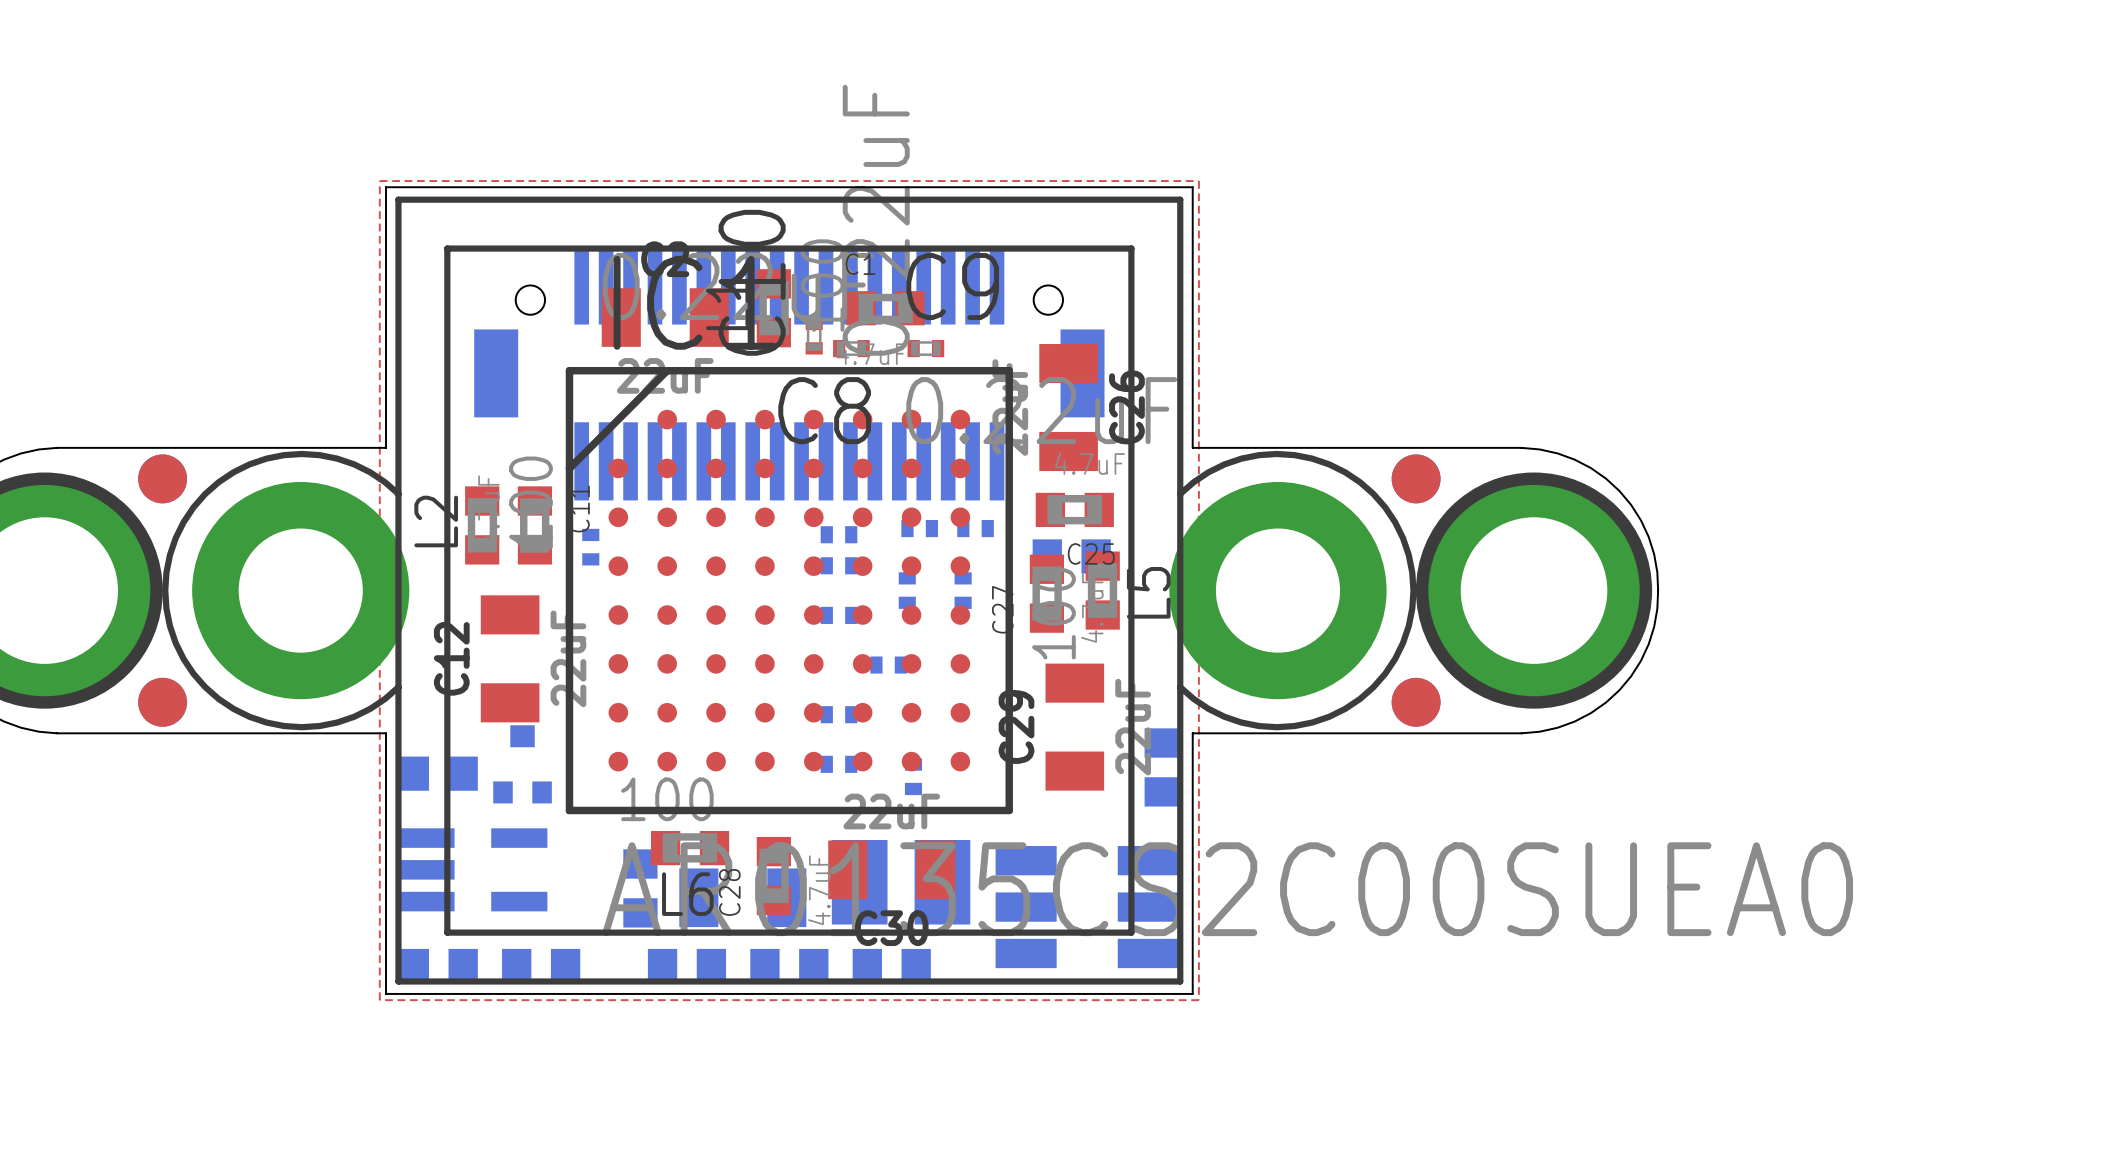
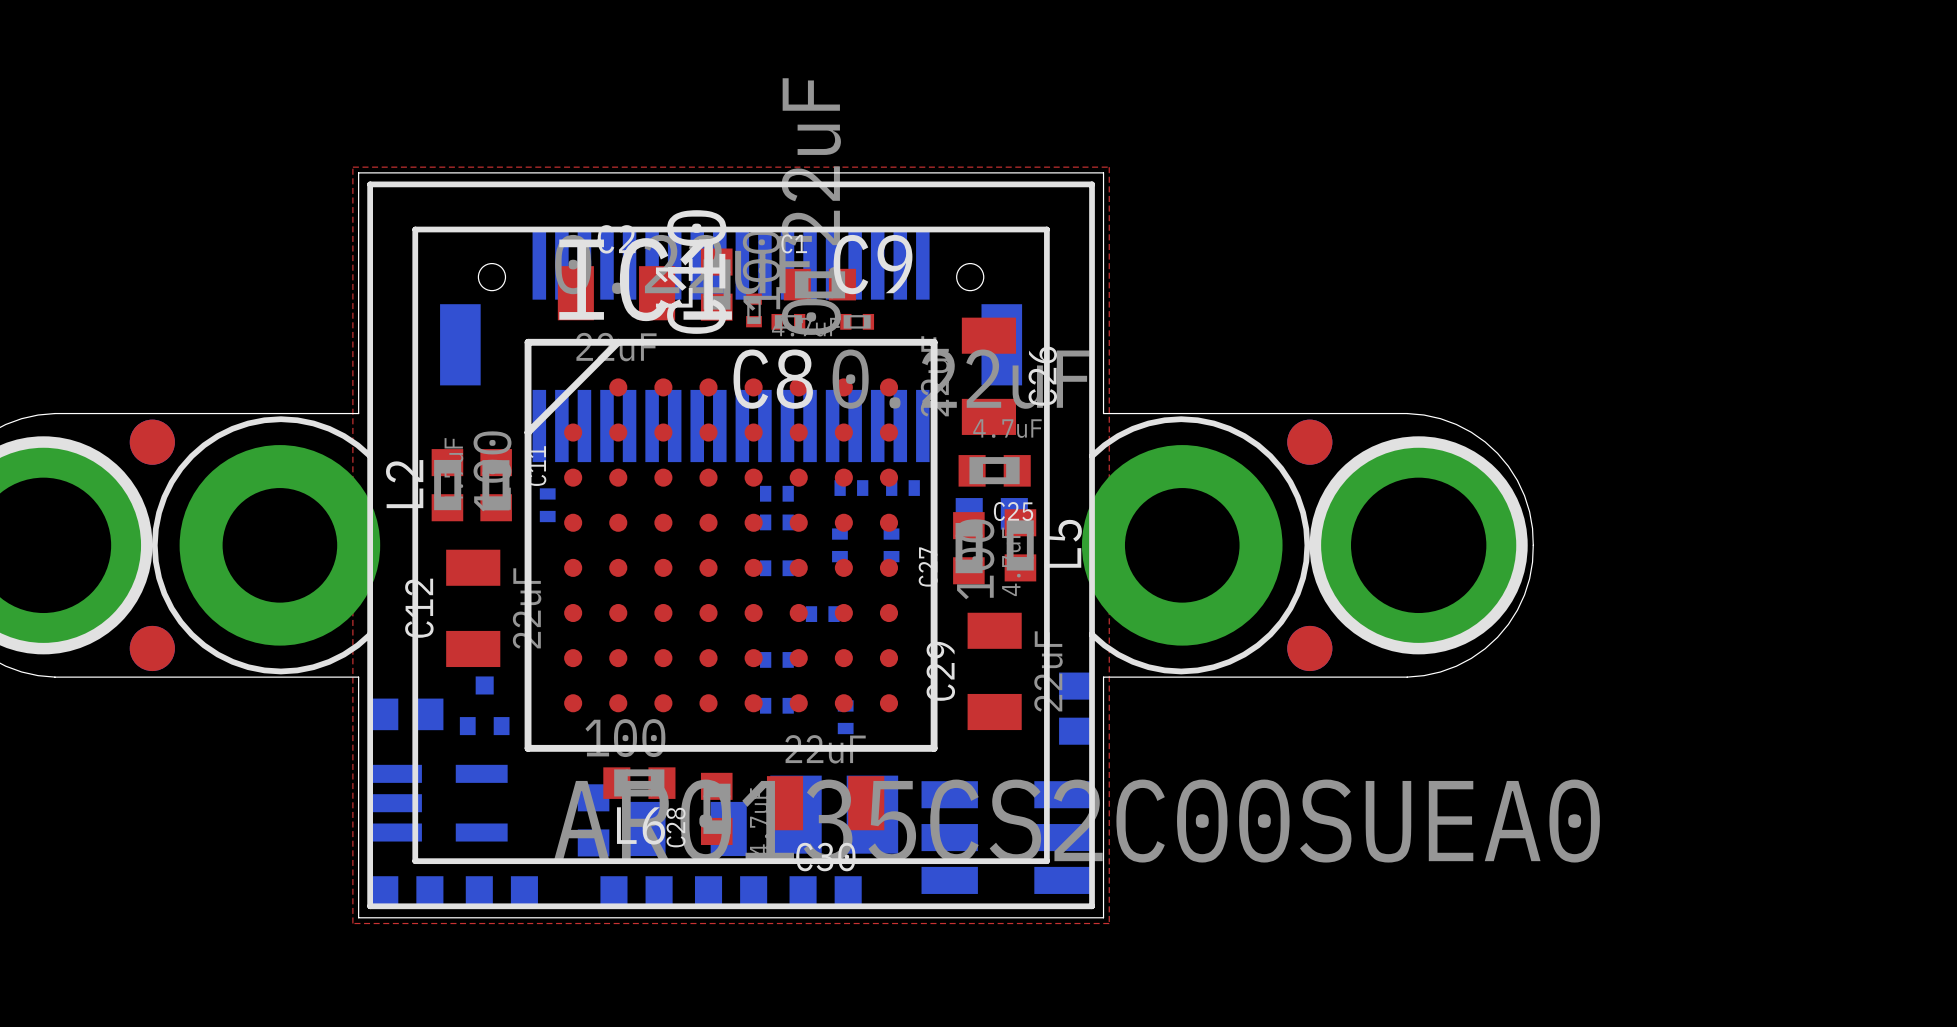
part footprint: [493, 725, 552, 804] -> [459, 676, 510, 736]

